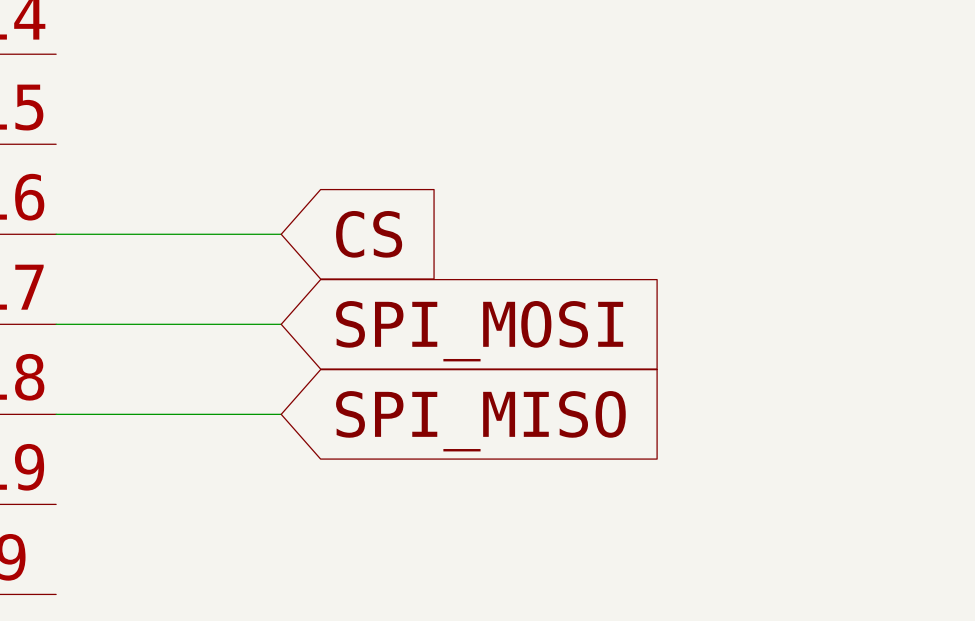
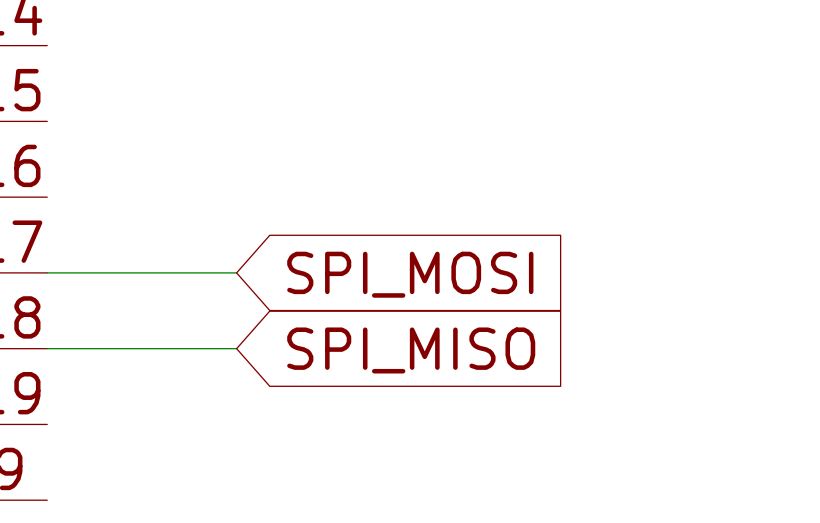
wire: (56, 234) (281, 234) -> none
global label: CS (369, 234) -> none

